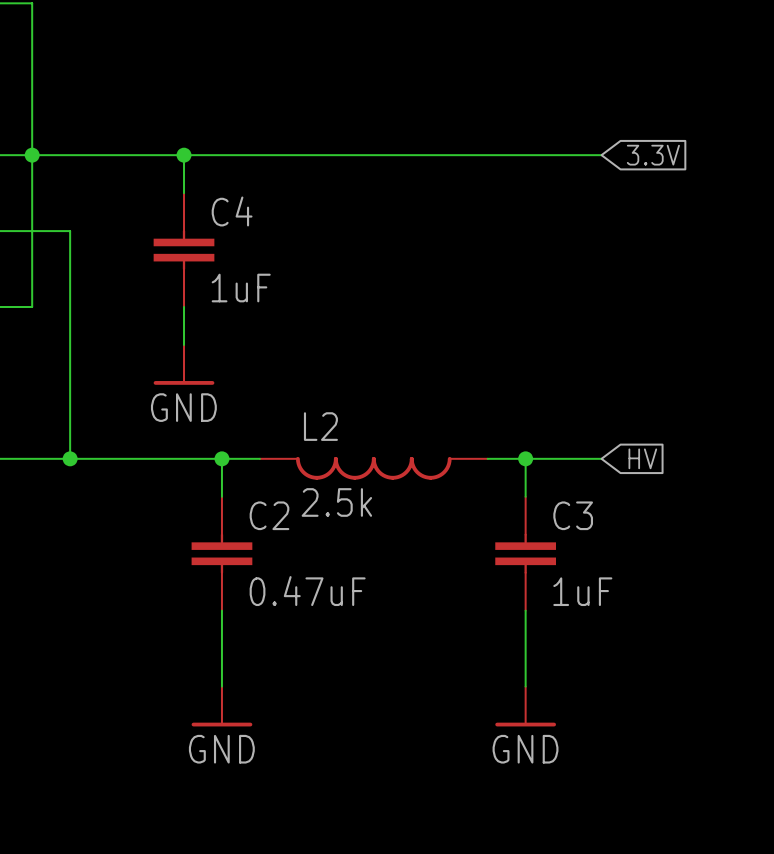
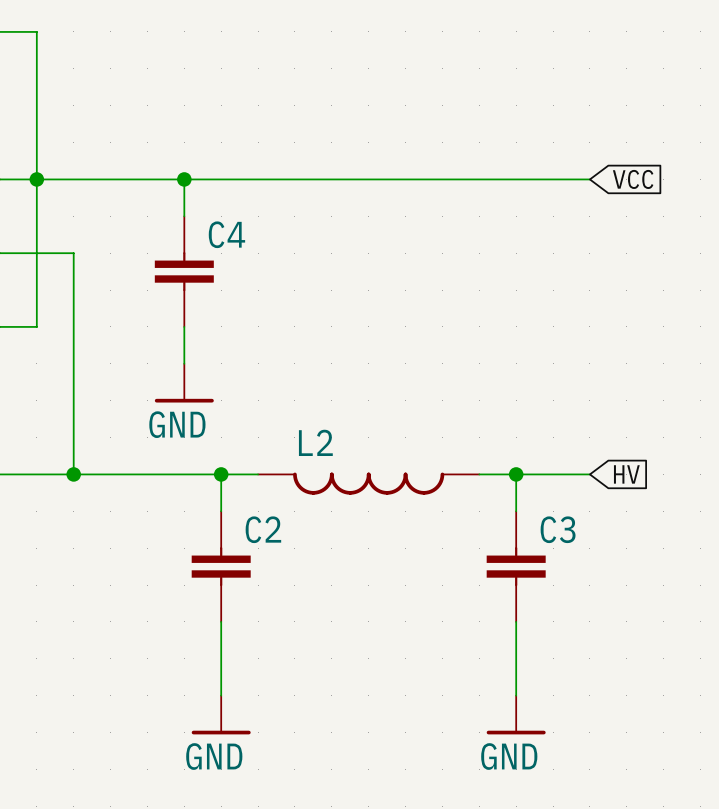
global label: 3.3V (653, 155) -> VCC (633, 179)
C4 value: 1uF (241, 288) -> none
L2 value: 2.5k (336, 502) -> none
C2 value: 0.47uF (307, 591) -> none
C3 value: 1uF (582, 591) -> none

